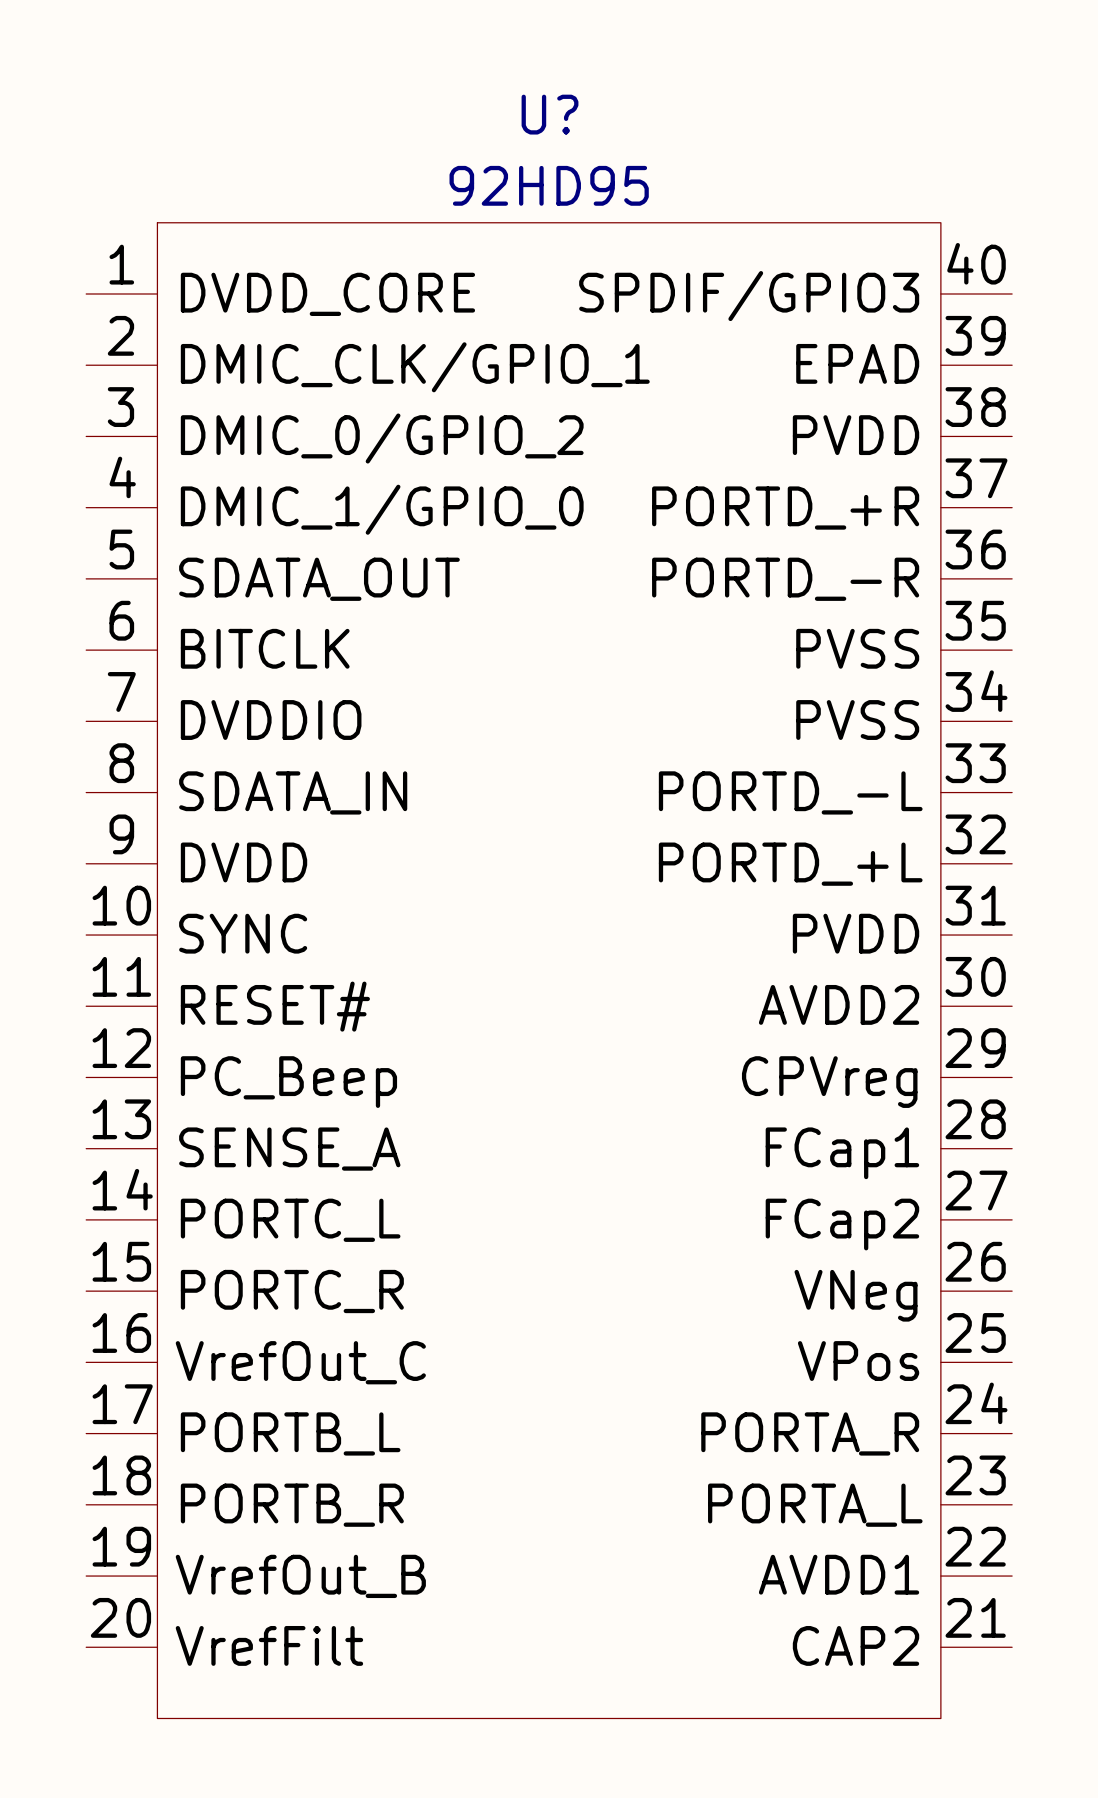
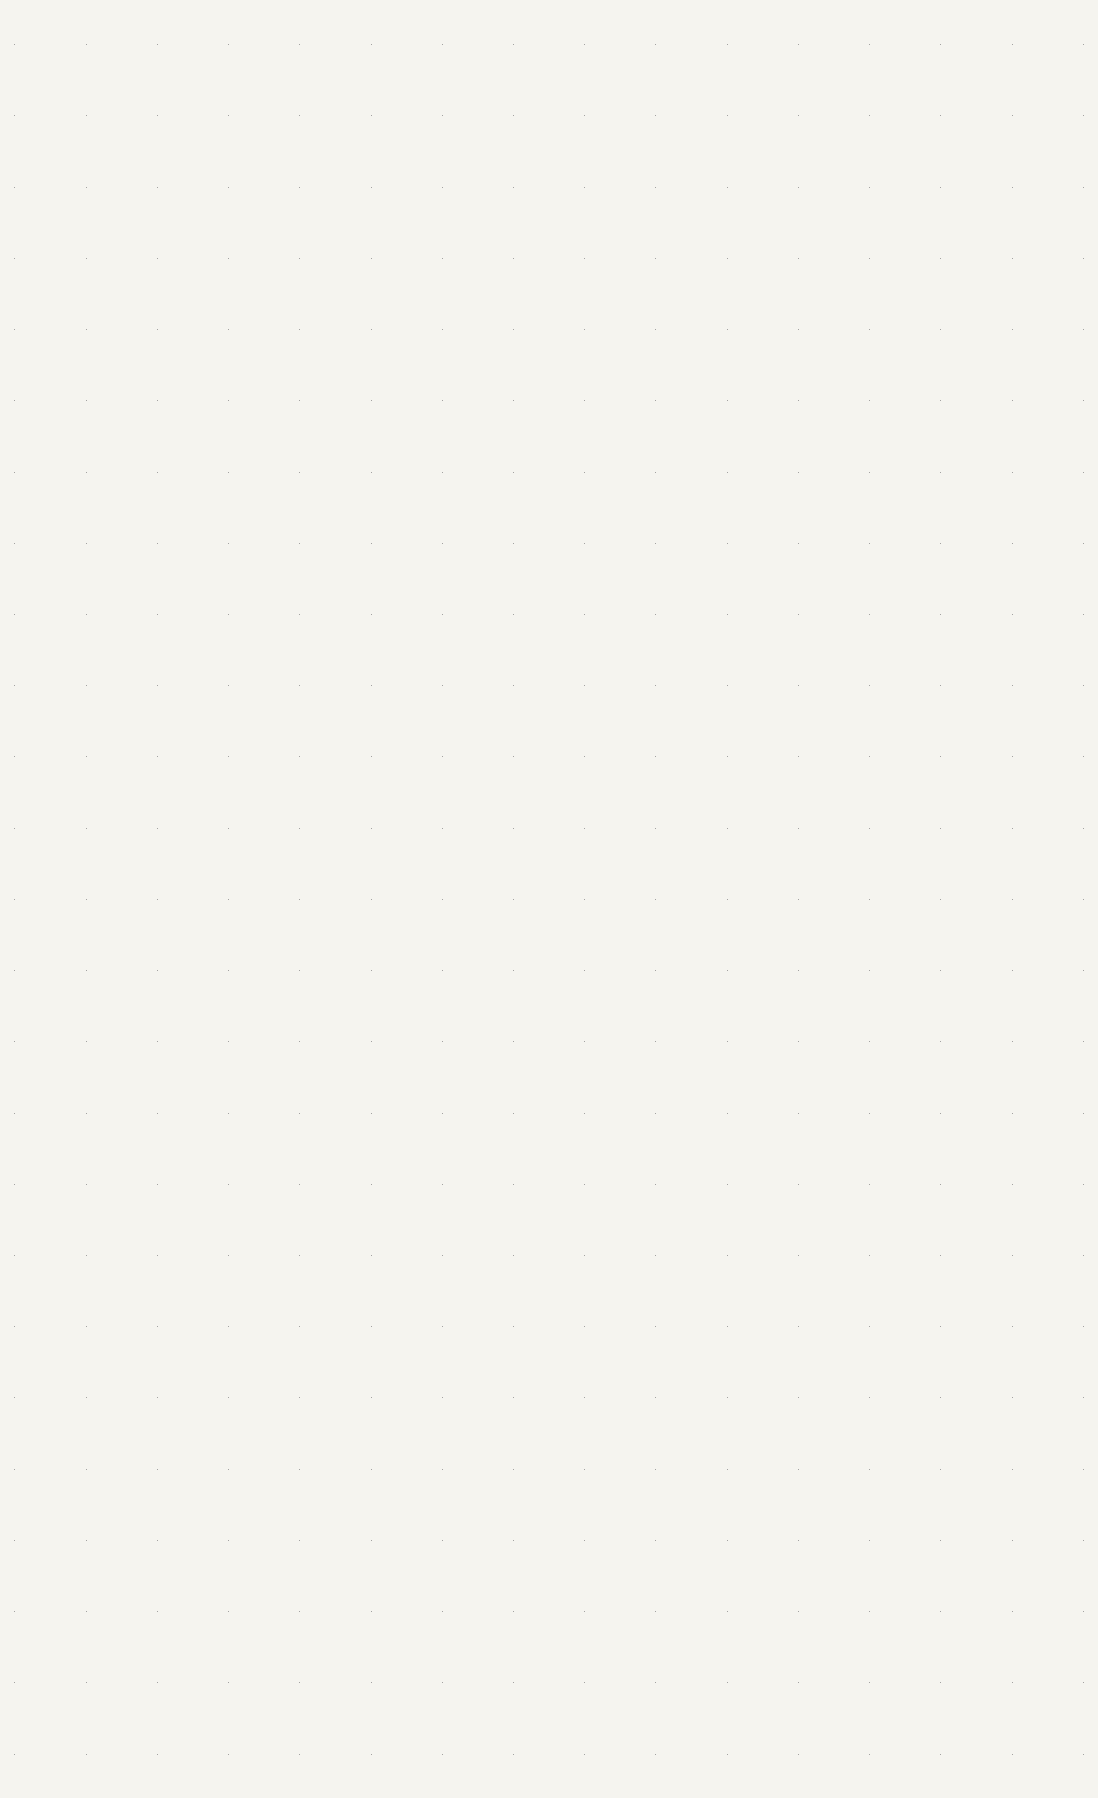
U?: 92HD95 (549, 970) -> none

